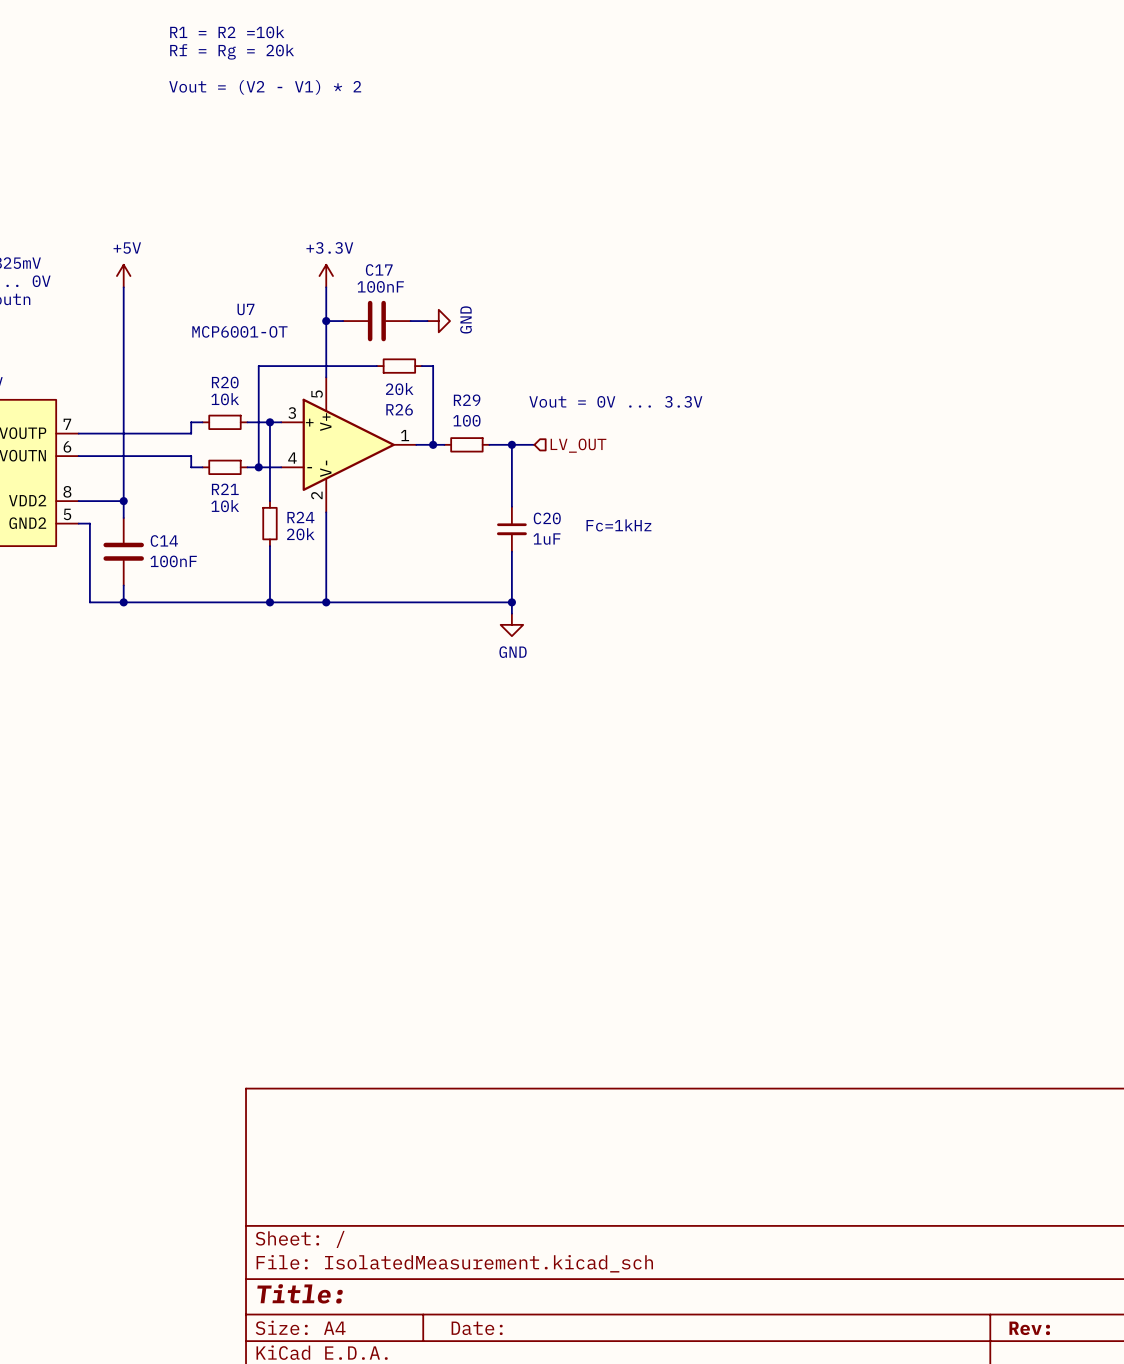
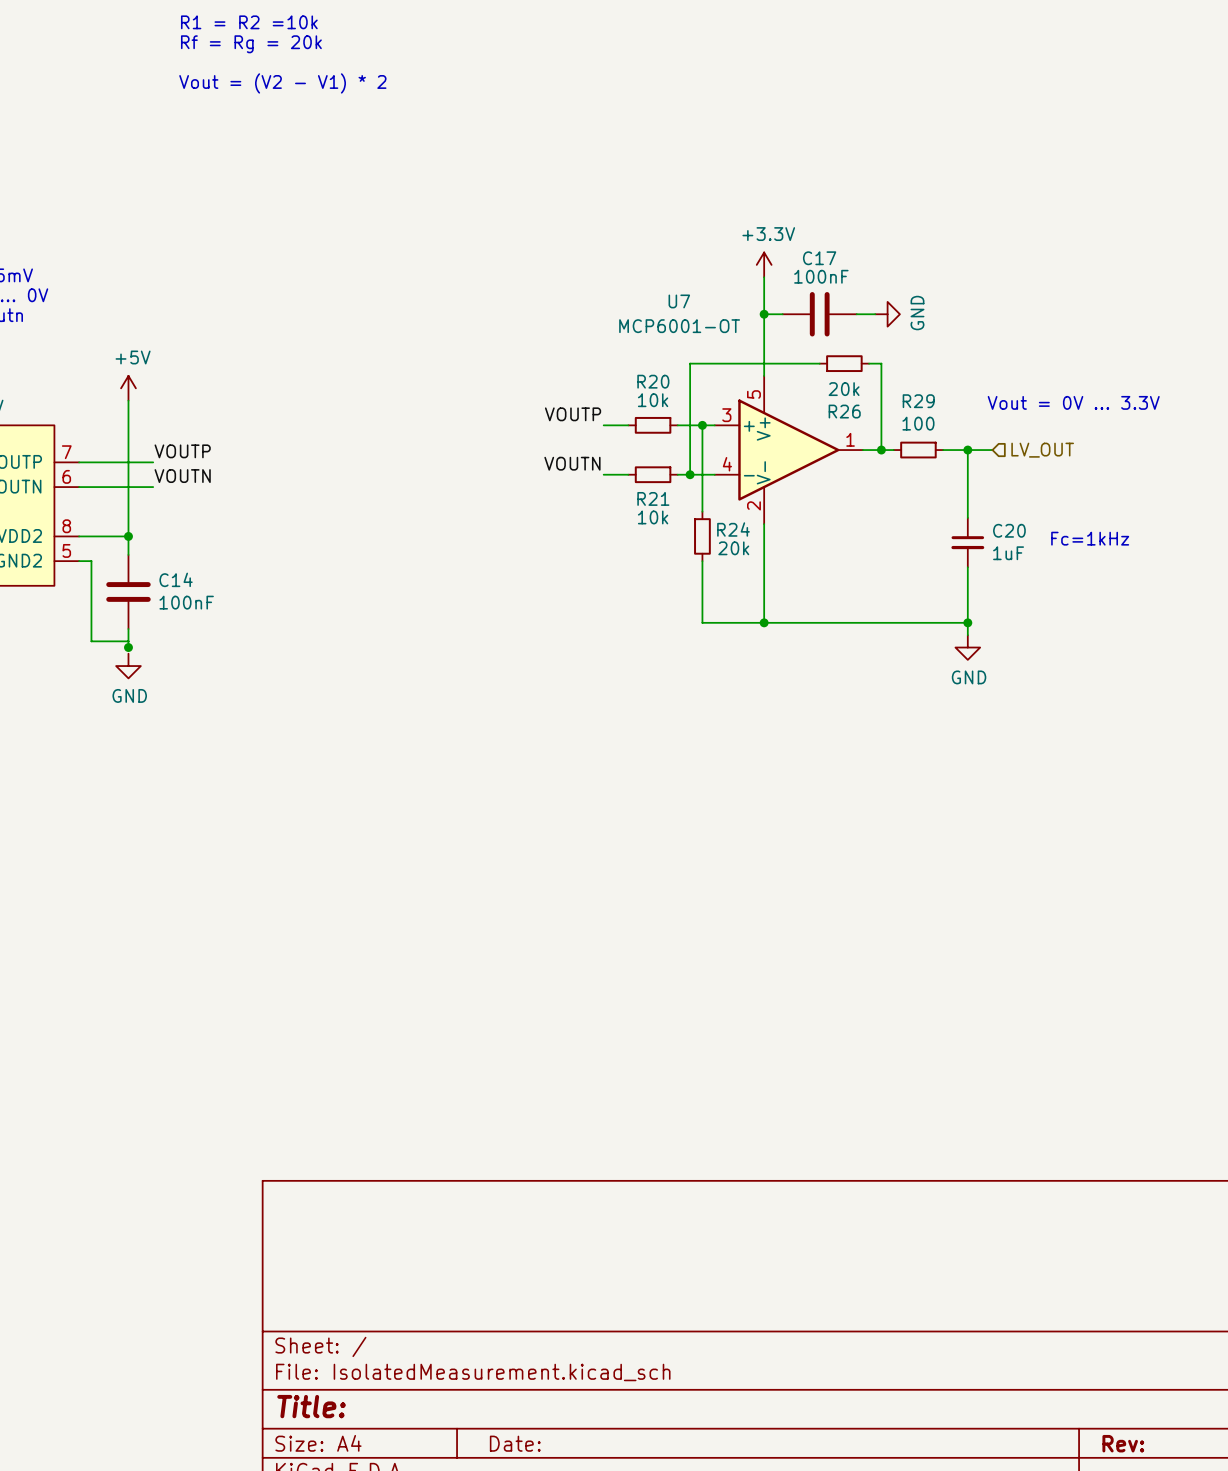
power symbol: none -> +3.3V (764, 264)
wire: none -> (764, 277) (764, 375)
power symbol position: +5V (123, 276) -> +5V (128, 388)
power symbol: +3.3V (326, 276) -> none
wire: (123, 287) (123, 377) -> none
wire: (326, 287) (326, 377) -> none
wire: none -> (764, 314) (782, 314)
junction: none -> (764, 314)
wire: none -> (856, 314) (875, 314)
power symbol: none -> GND (887, 314)
wire: (326, 321) (343, 321) -> none
junction: (326, 321) -> none
C17 position: (376, 321) -> (819, 314)
wire: (410, 321) (427, 321) -> none
power symbol: GND (438, 321) -> none
wire: none -> (819, 363) (690, 363) (690, 474)
wire: none -> (869, 363) (881, 363) (881, 450)
wire: (376, 366) (258, 366) (258, 467) -> none
R26 position: (399, 366) -> (844, 363)
wire: (421, 366) (433, 366) (433, 444) -> none
text: none -> Vout = 0V ... 3.3V (1073, 402)
label: none -> VOUTP (573, 414)
wire: none -> (603, 425) (628, 425)
wire: none -> (677, 425) (714, 425)
wire: none -> (702, 425) (702, 511)
junction: none -> (702, 425)
text: Vout = 0V ... 3.3V (615, 401) -> none
wire: (202, 422) (191, 422) (191, 433) (146, 433) -> none
R20 position: (224, 422) -> (653, 425)
wire: (247, 422) (281, 422) -> none
wire: (269, 422) (269, 501) -> none
junction: (269, 422) -> none
wire: none -> (862, 450) (893, 450)
junction: none -> (881, 450)
wire: none -> (943, 450) (992, 450)
wire: none -> (967, 450) (967, 517)
junction: none -> (967, 450)
label: none -> VOUTP (182, 451)
hierarchical label: none -> LV_OUT (1042, 450)
label: none -> VOUTN (572, 463)
U7 position: (348, 444) -> (788, 450)
wire: (416, 444) (444, 444) -> none
junction: (433, 444) -> none
R29 position: (466, 444) -> (918, 450)
wire: (489, 444) (534, 444) -> none
wire: (511, 444) (511, 506) -> none
junction: (511, 444) -> none
wire: none -> (603, 474) (628, 474)
wire: none -> (677, 474) (714, 474)
junction: none -> (690, 474)
hierarchical label: LV_OUT (578, 445) -> none
label: none -> VOUTN (182, 476)
wire: (146, 456) (191, 456) (191, 467) (202, 467) -> none
R21 position: (224, 467) -> (653, 474)
wire: (247, 467) (281, 467) -> none
junction: (258, 467) -> none
wire: none -> (764, 524) (764, 622)
text: none -> Fc=1kHz (1090, 538)
wire: (326, 512) (326, 602) -> none
R24 position: (269, 523) -> (702, 536)
wire: none -> (702, 561) (702, 622) (967, 622)
text: Fc=1kHz (618, 525) -> none
C20 position: (511, 529) -> (967, 542)
wire: none -> (967, 567) (967, 635)
wire: (269, 546) (269, 602) -> none
wire: (511, 551) (511, 613) -> none
junction: none -> (764, 622)
junction: none -> (967, 622)
wire: (89, 596) (89, 602) (511, 602) -> (91, 641) (128, 641)
junction: (269, 602) -> none
junction: (326, 602) -> none
junction: (511, 602) -> none
power symbol: none -> GND (967, 647)
power symbol: none -> GND (128, 666)
power symbol: GND (511, 624) -> none

